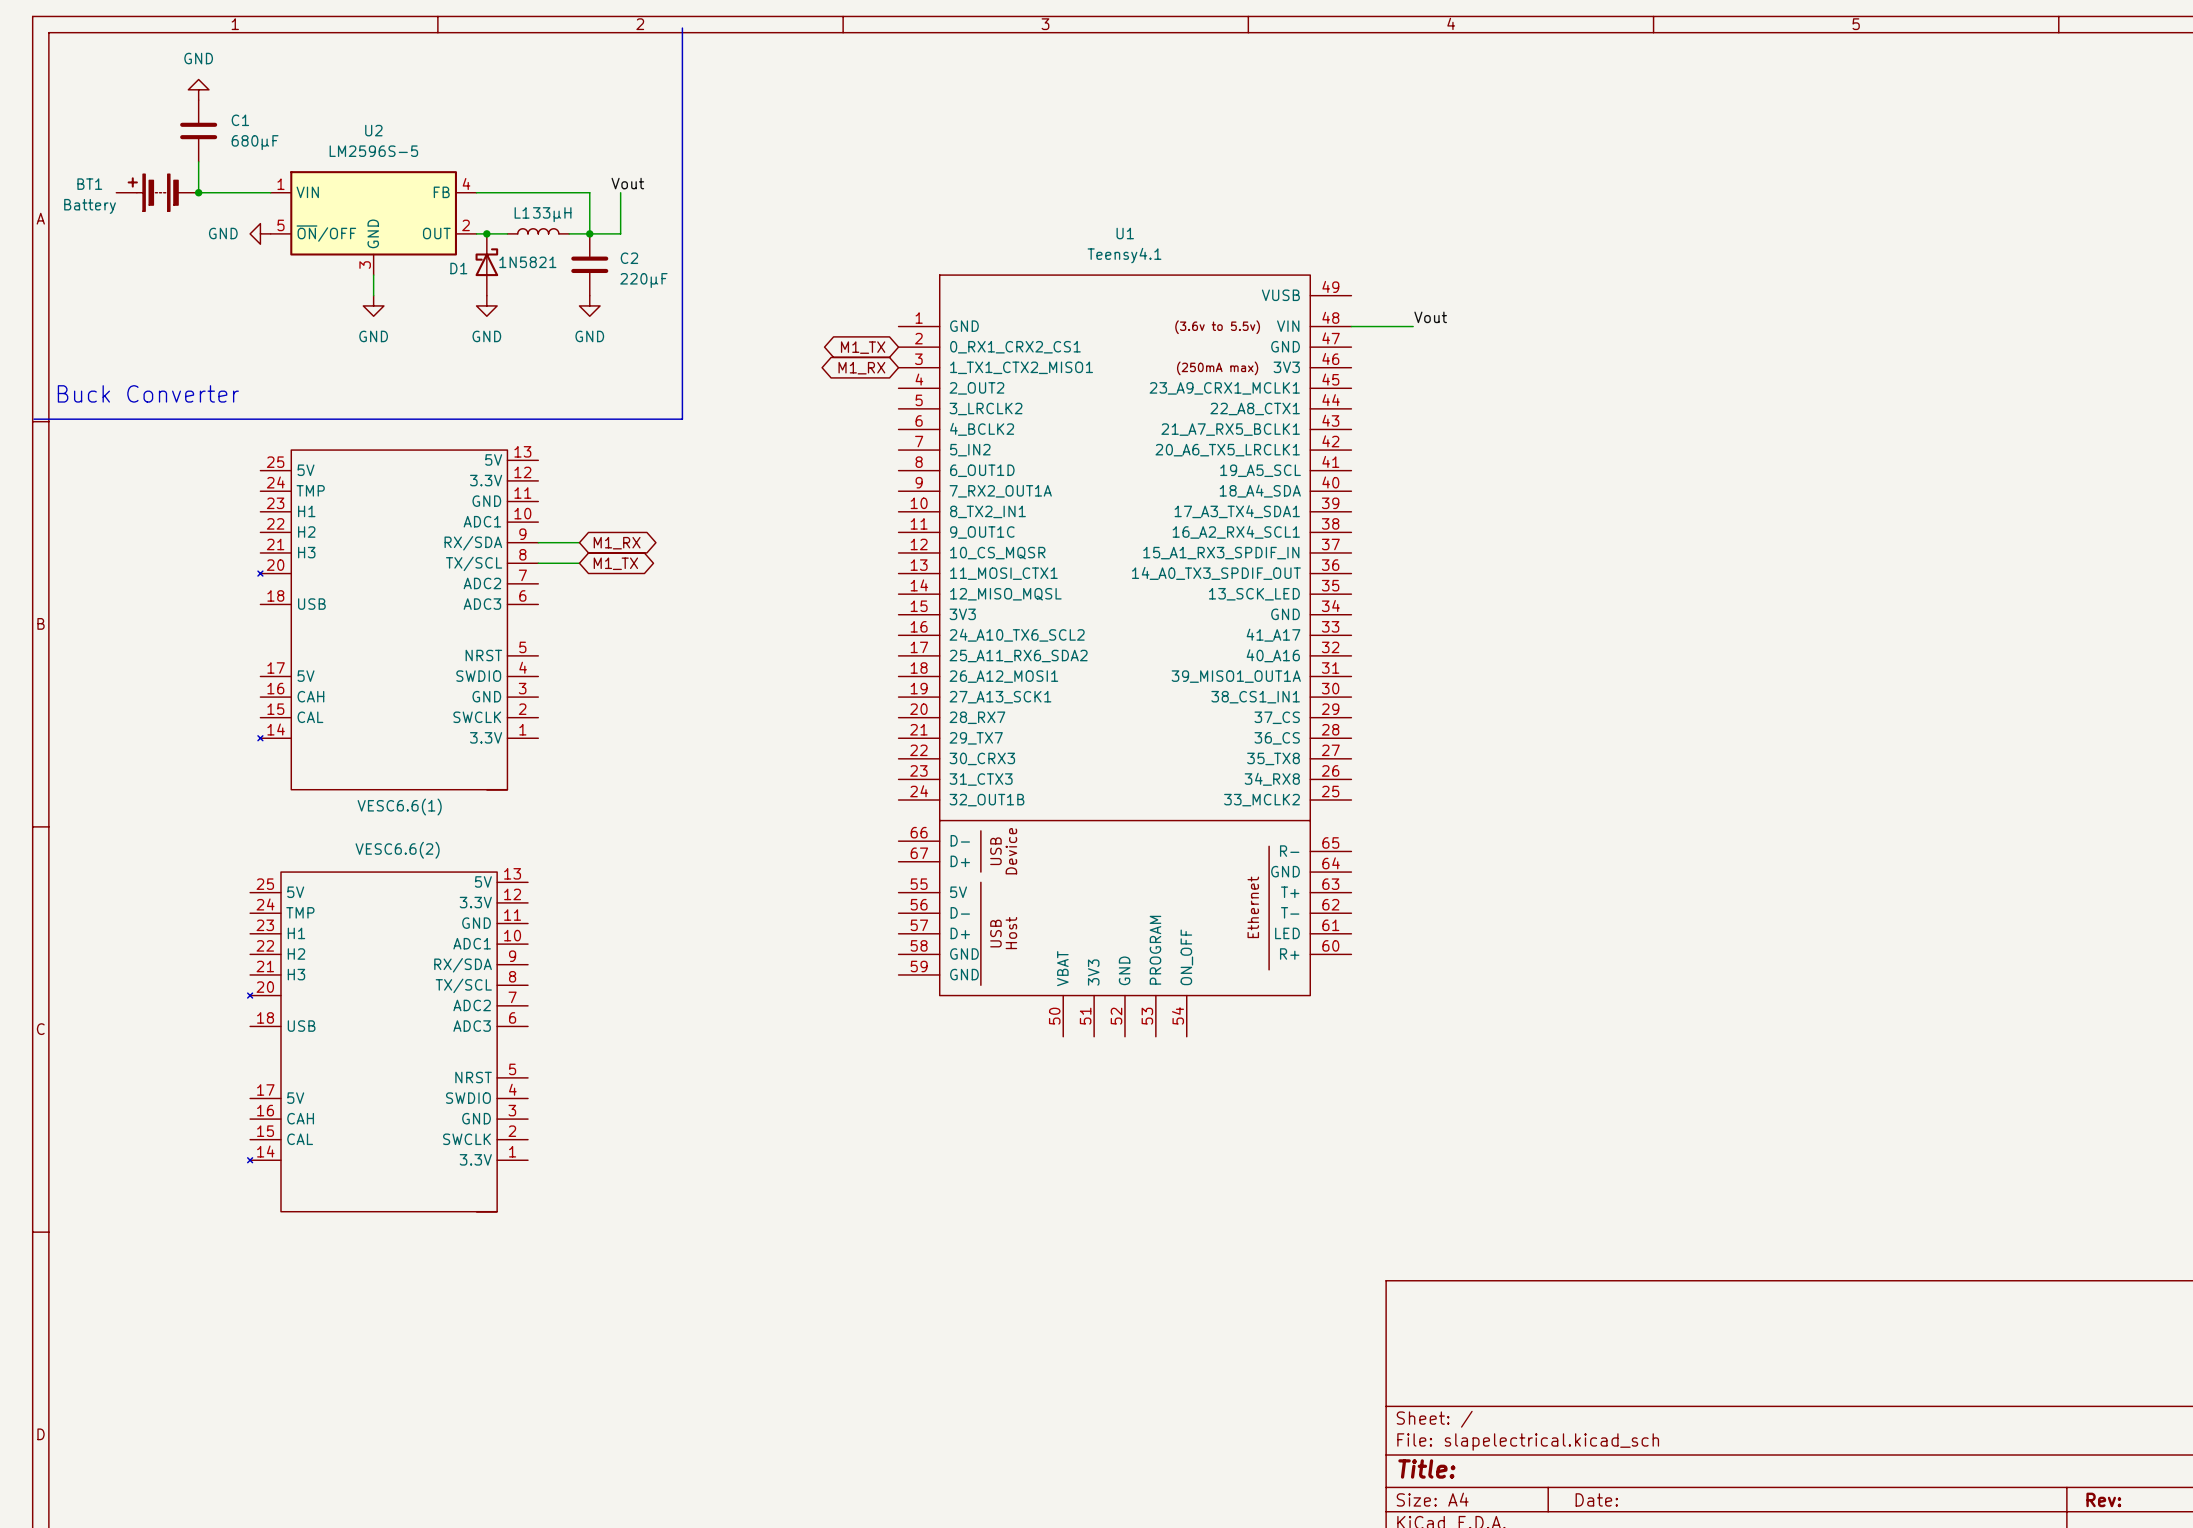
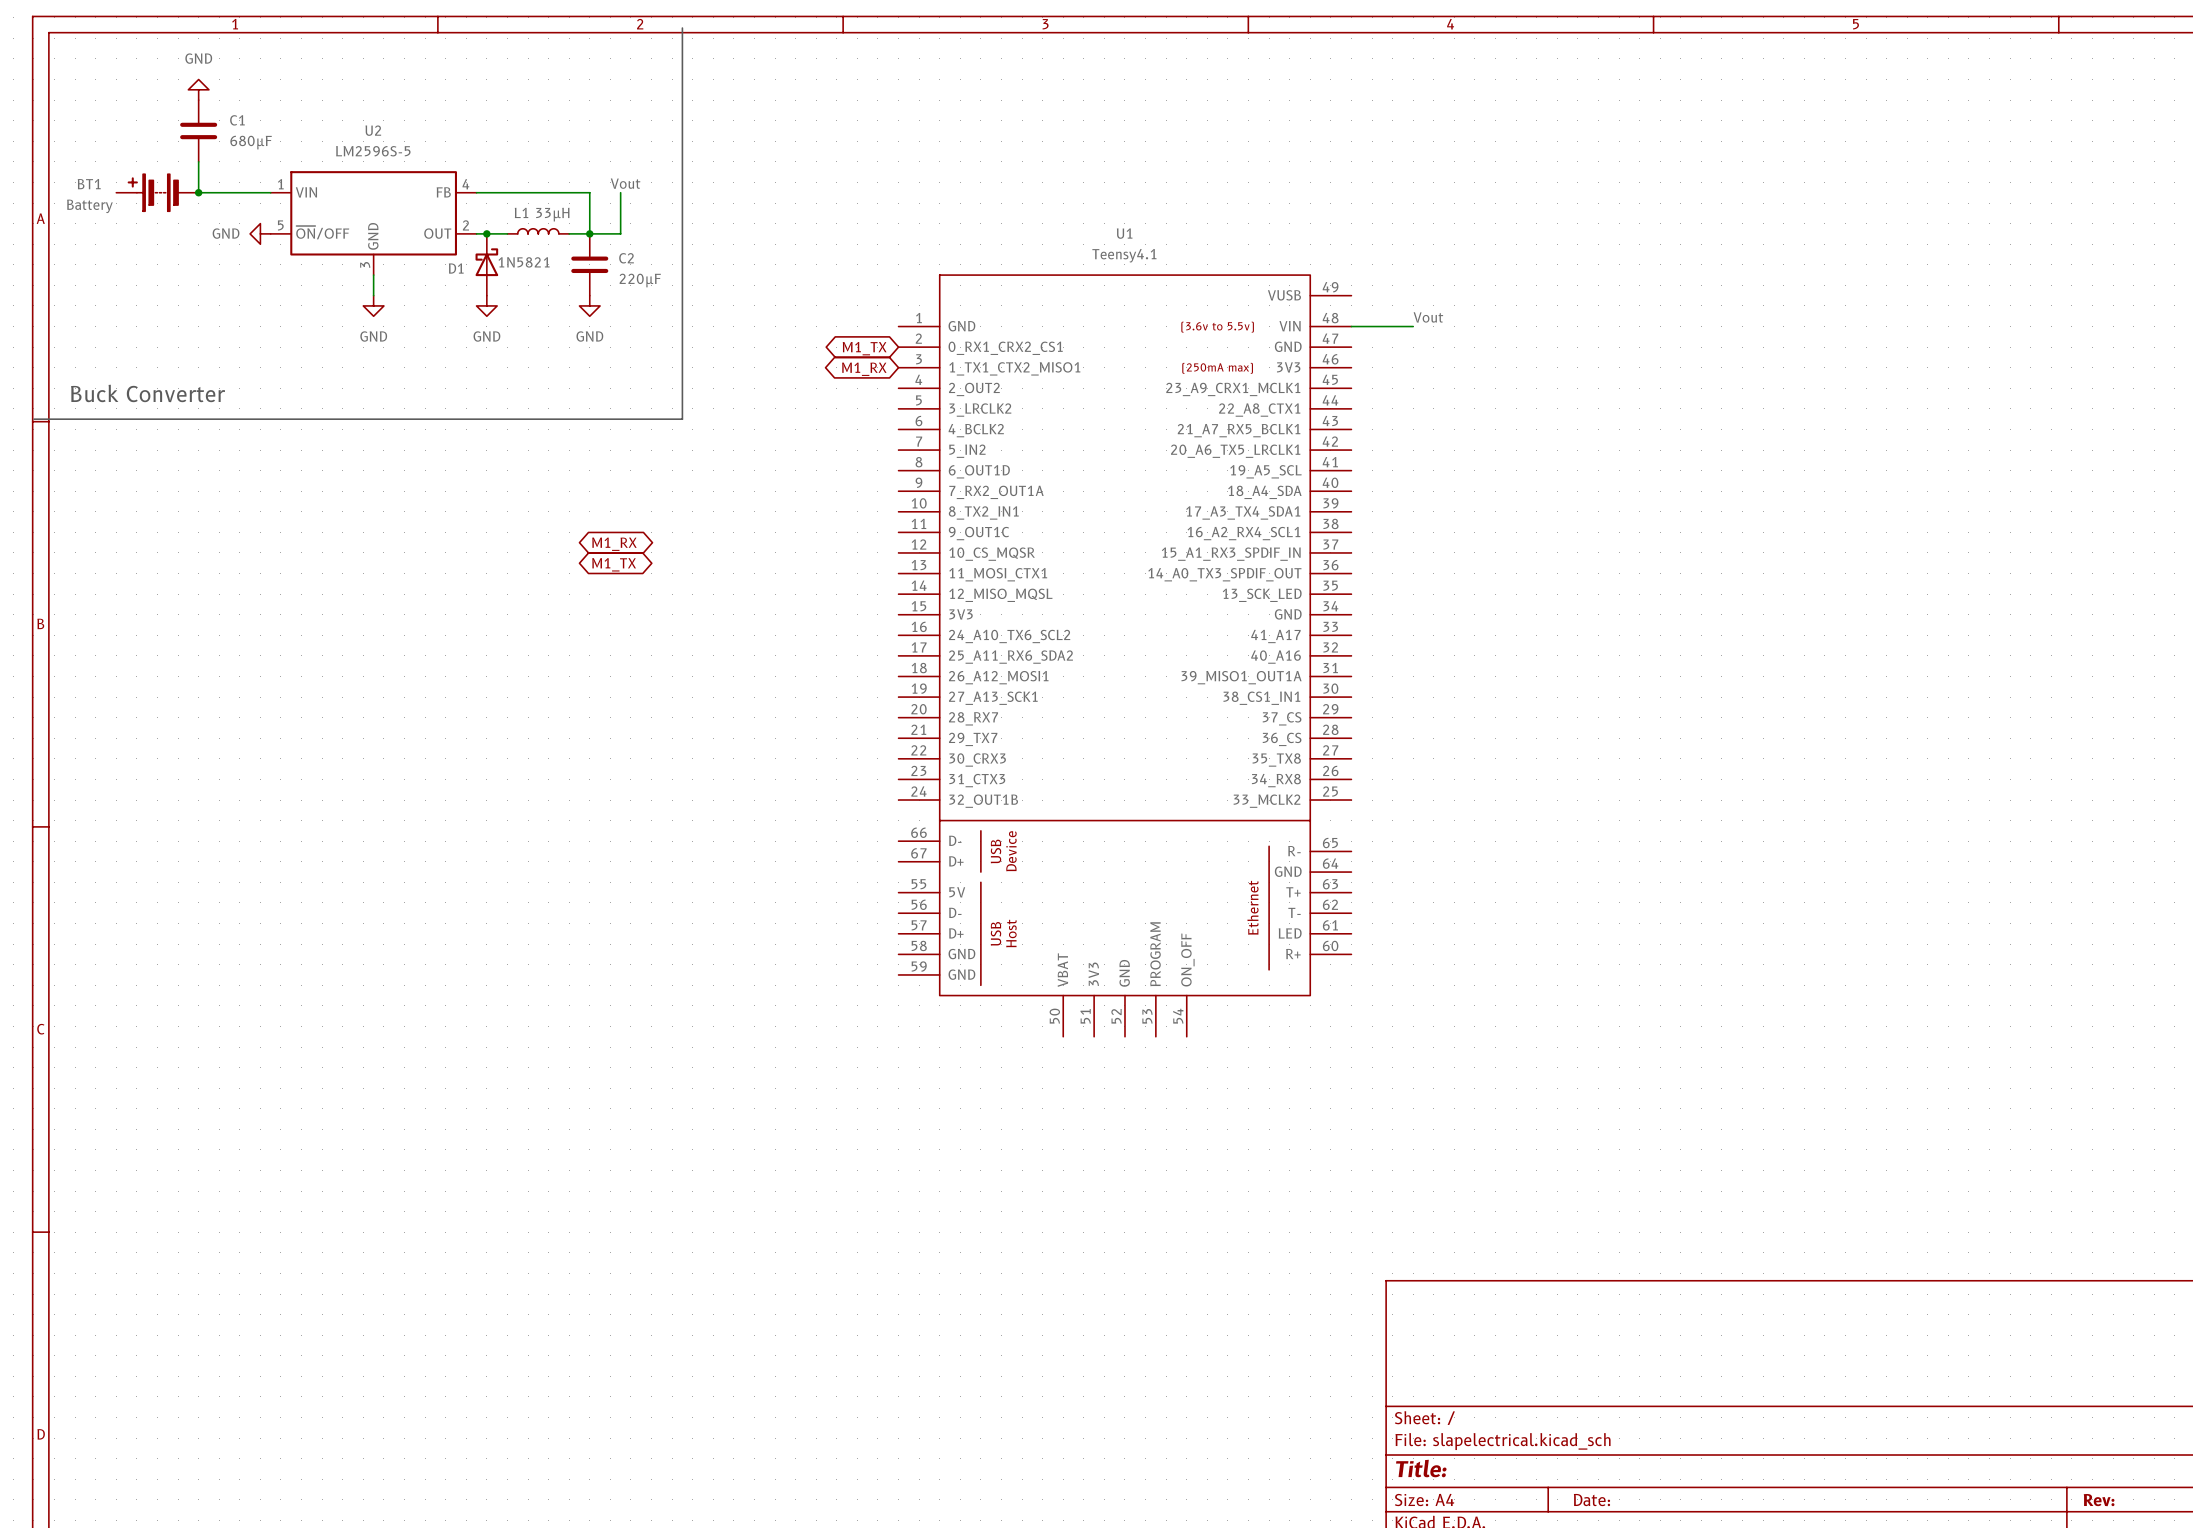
wire: (538, 542) (579, 542) -> none
wire: (538, 563) (579, 563) -> none
VESC6.6(1): (398, 619) -> none
VESC6.6(2): (387, 1041) -> none

